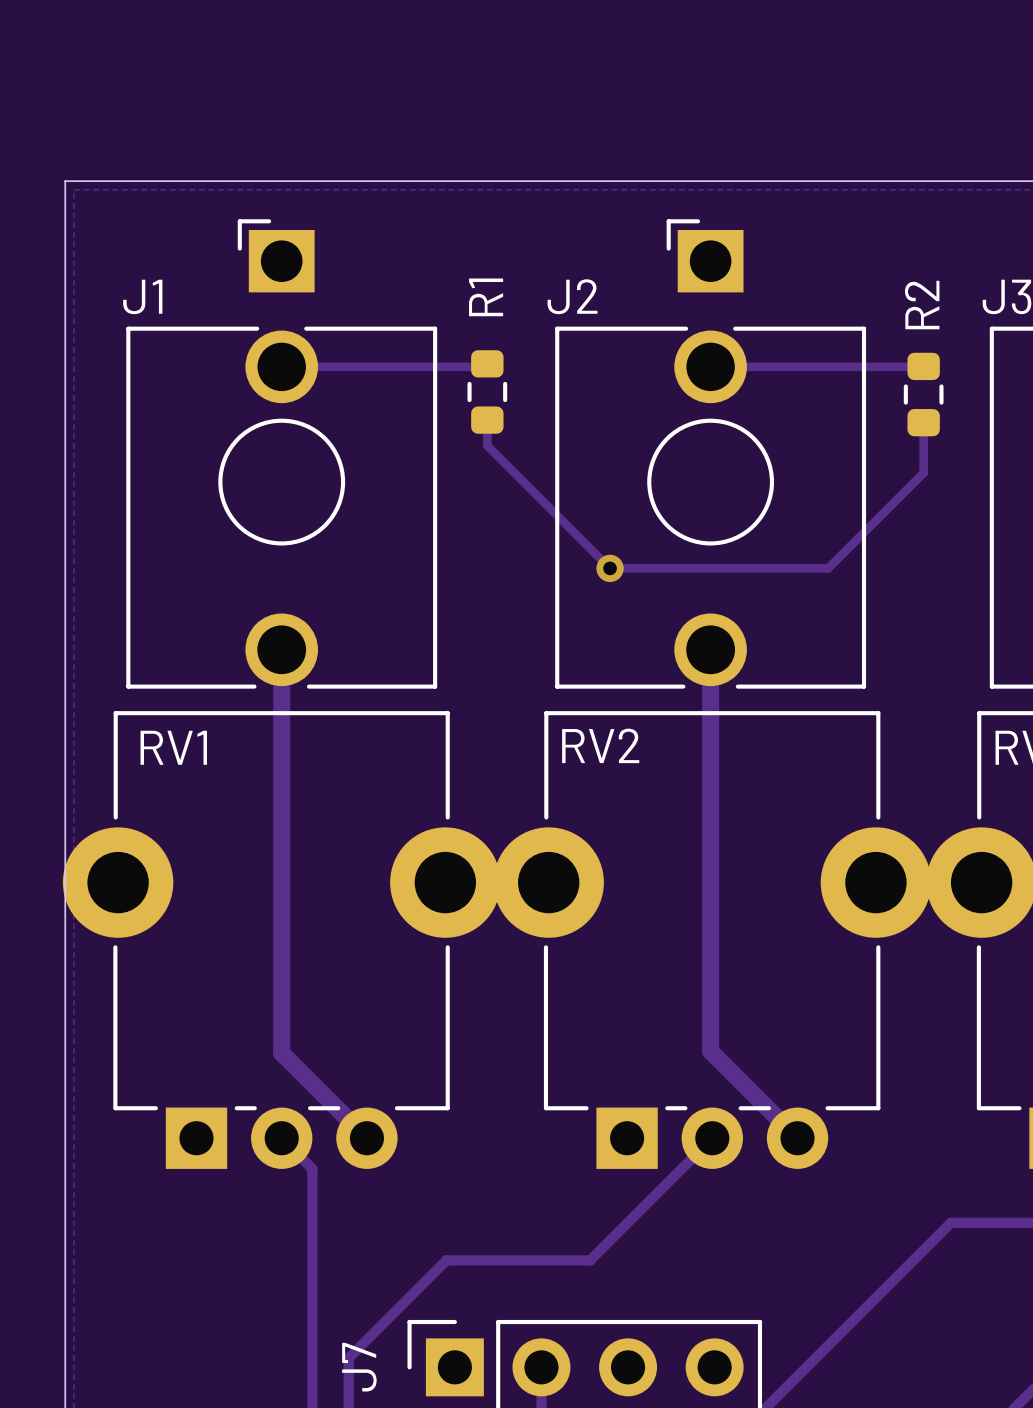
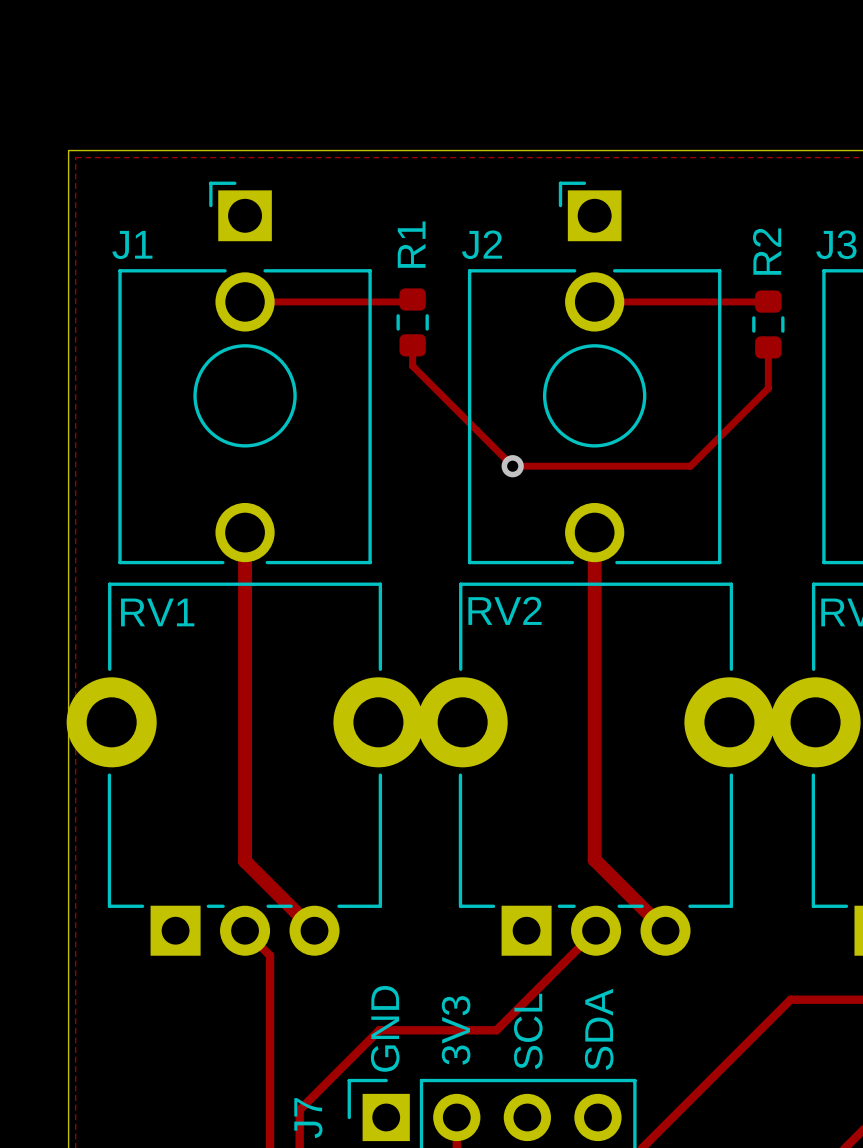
text: none -> GND (385, 1028)
text: none -> SDA (599, 1029)
text: none -> 3V3 (456, 1030)
text: none -> SCL (528, 1031)

